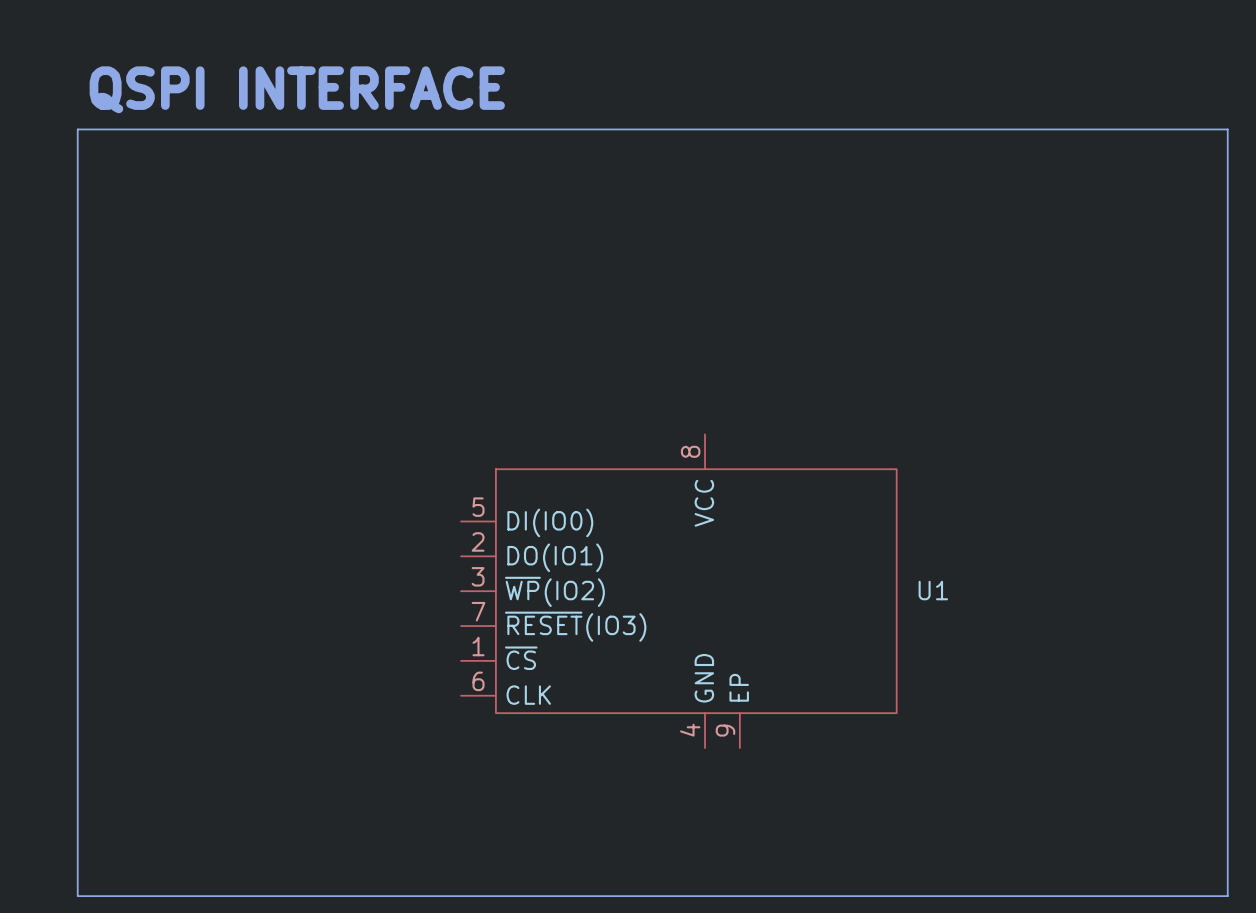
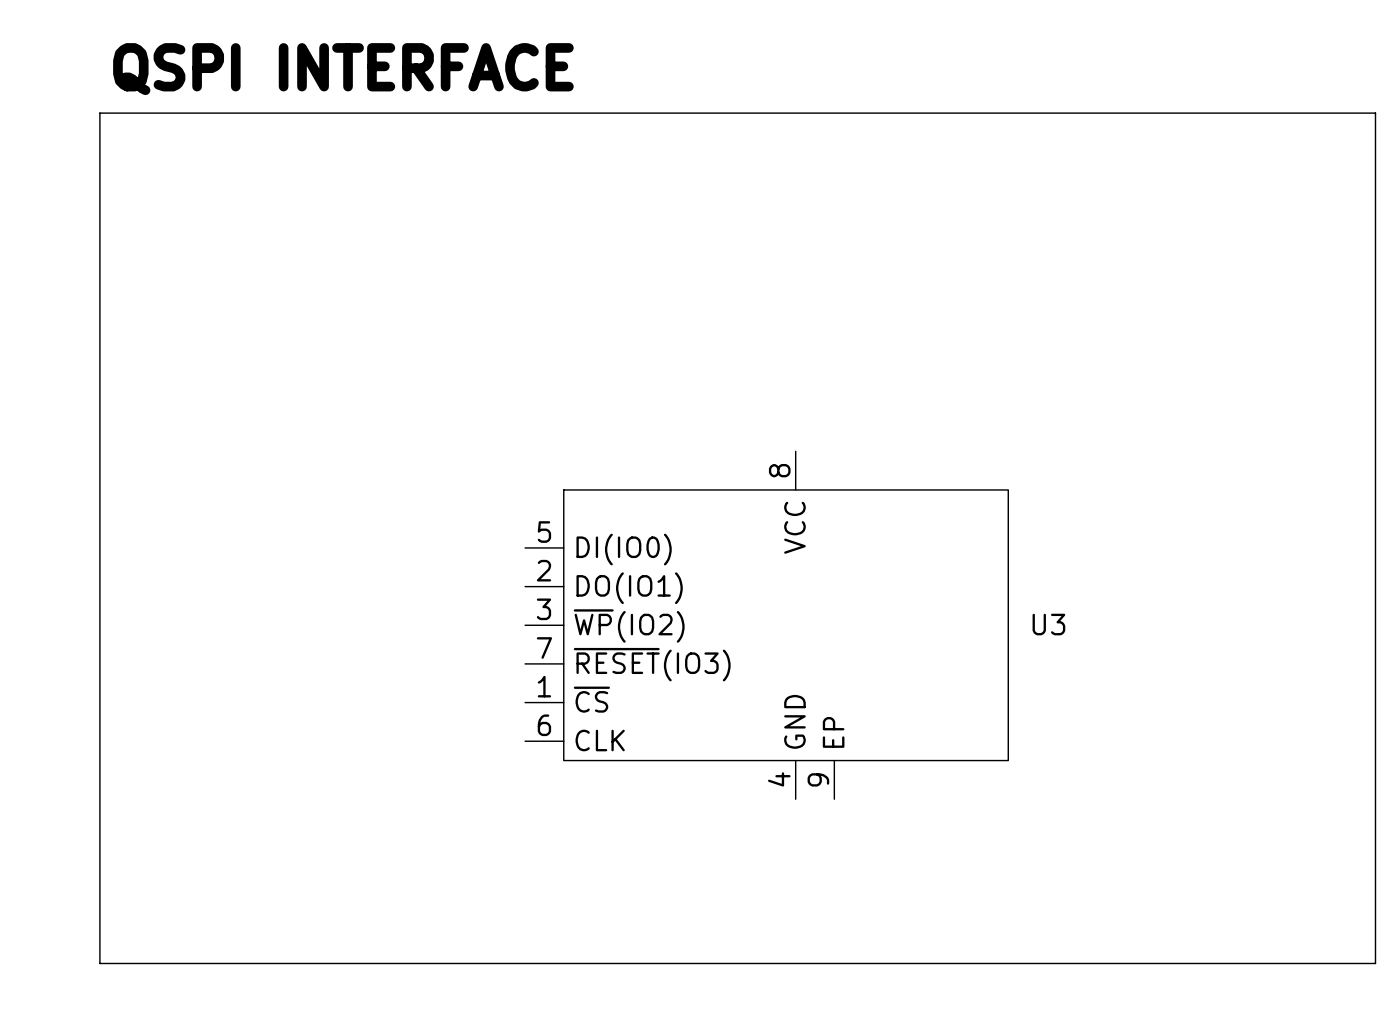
U1 name: U1 (933, 590) -> U3 (1048, 624)

